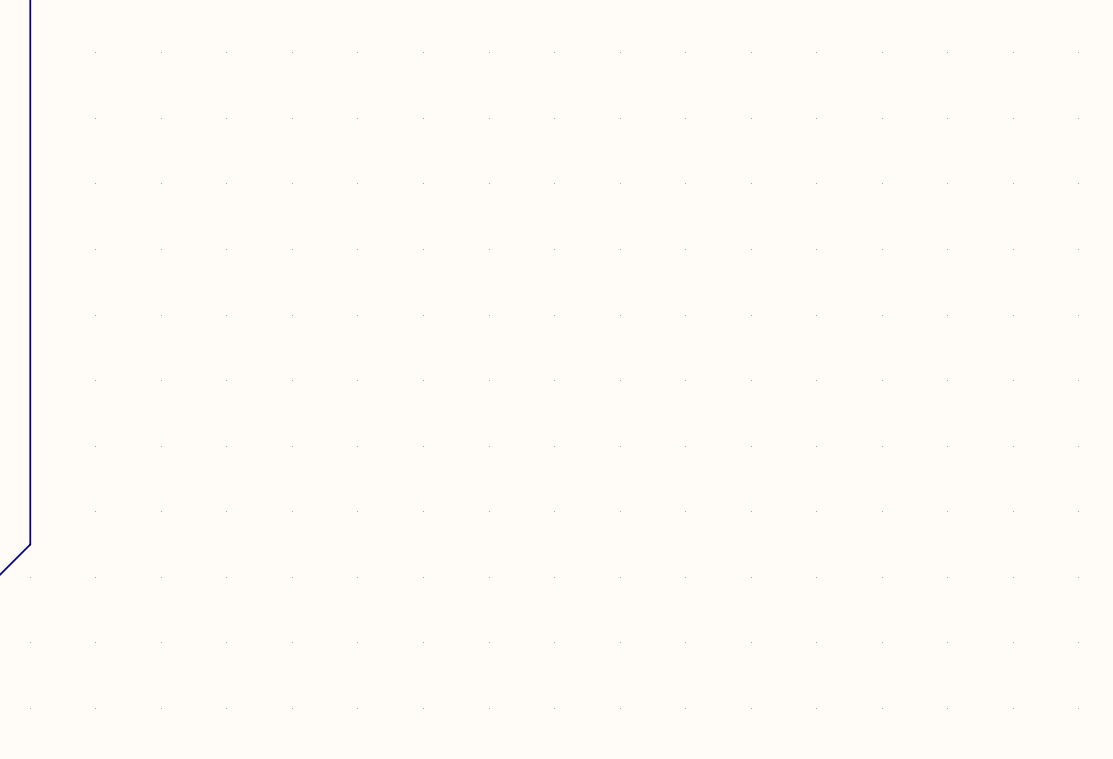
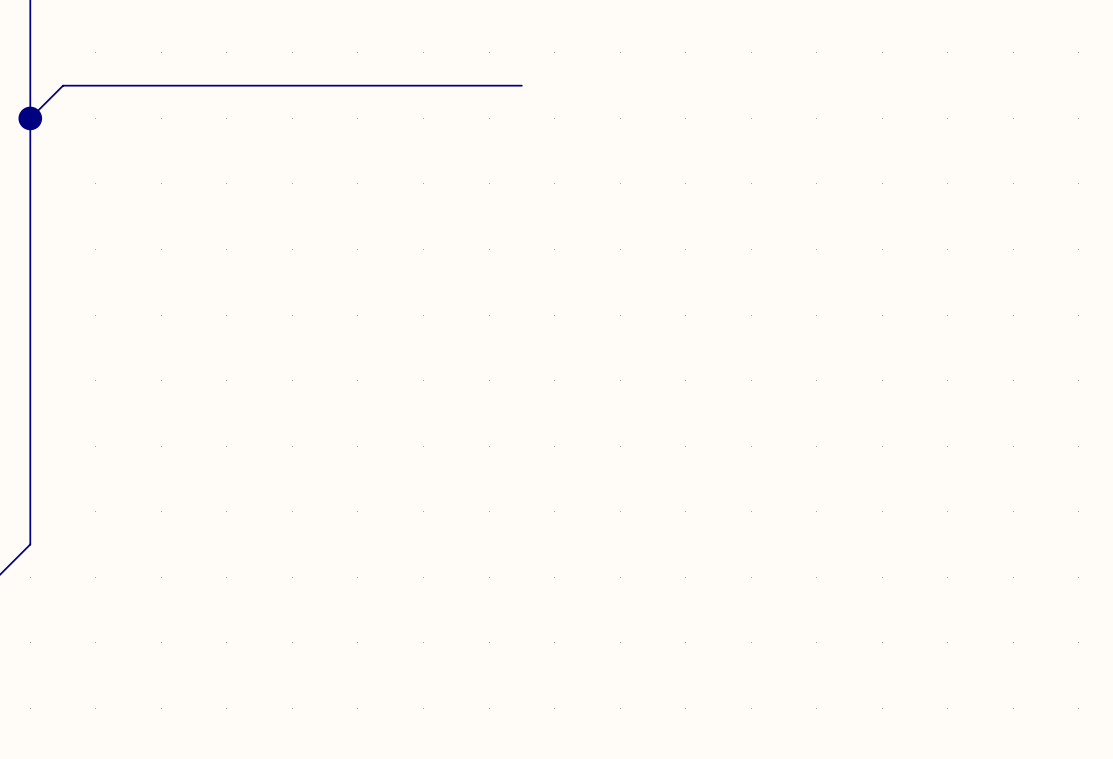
wire: none -> (521, 85) (63, 85) (30, 118)
junction: none -> (30, 118)

